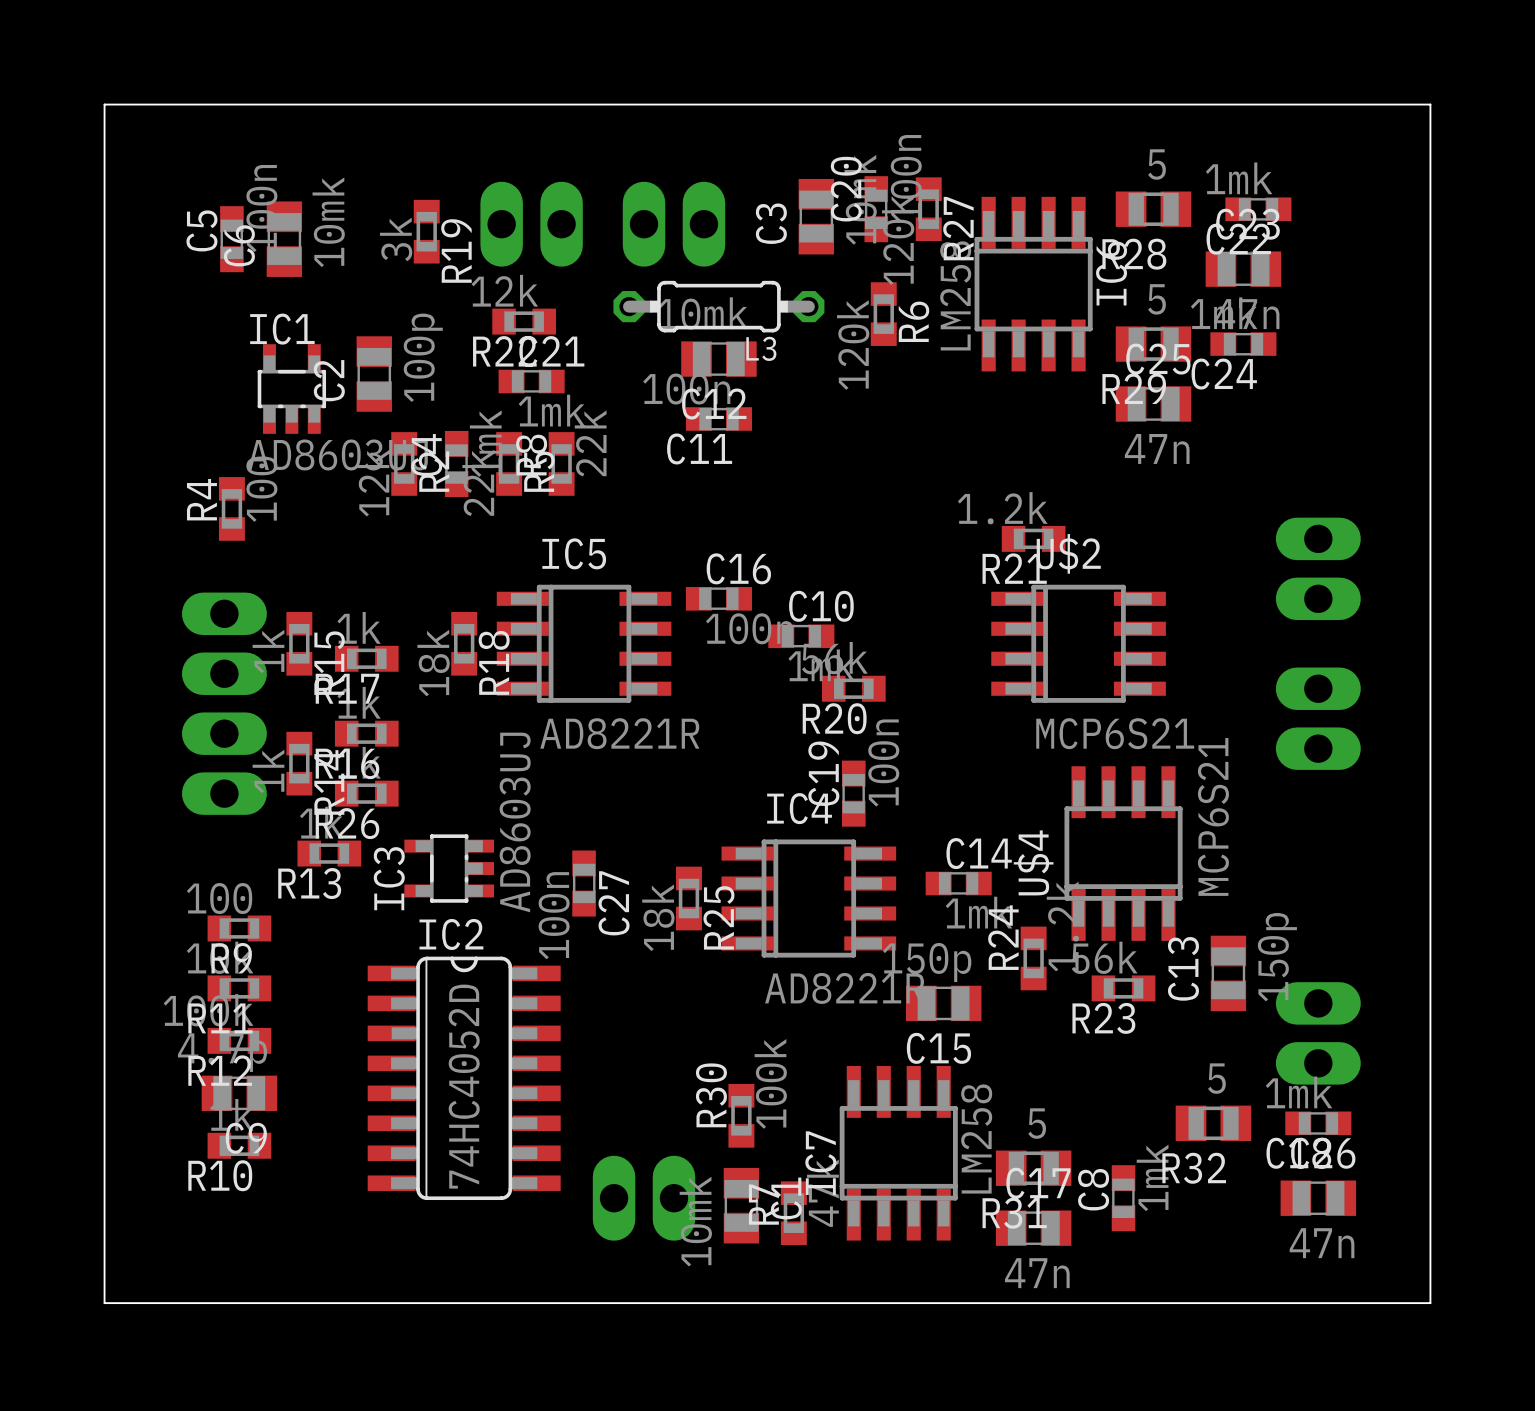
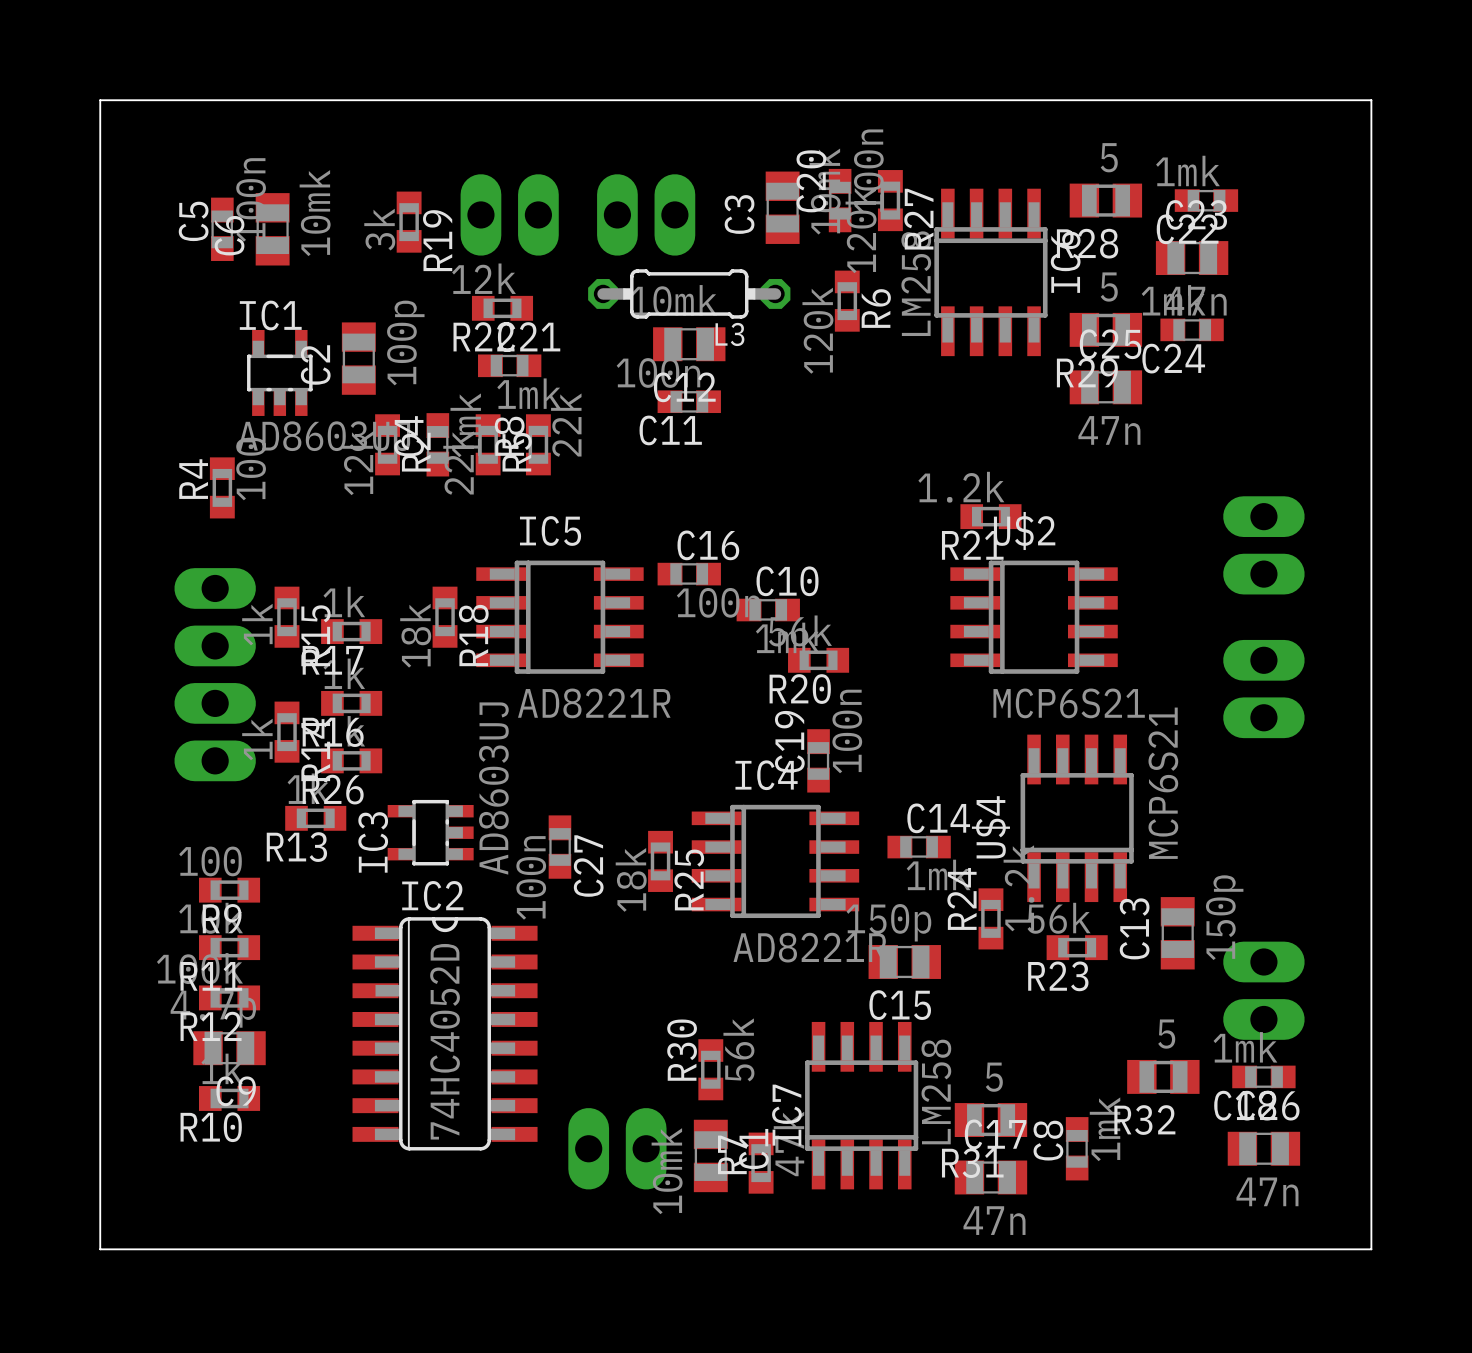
R30 value: 100k (770, 1083) -> 56k (738, 1049)

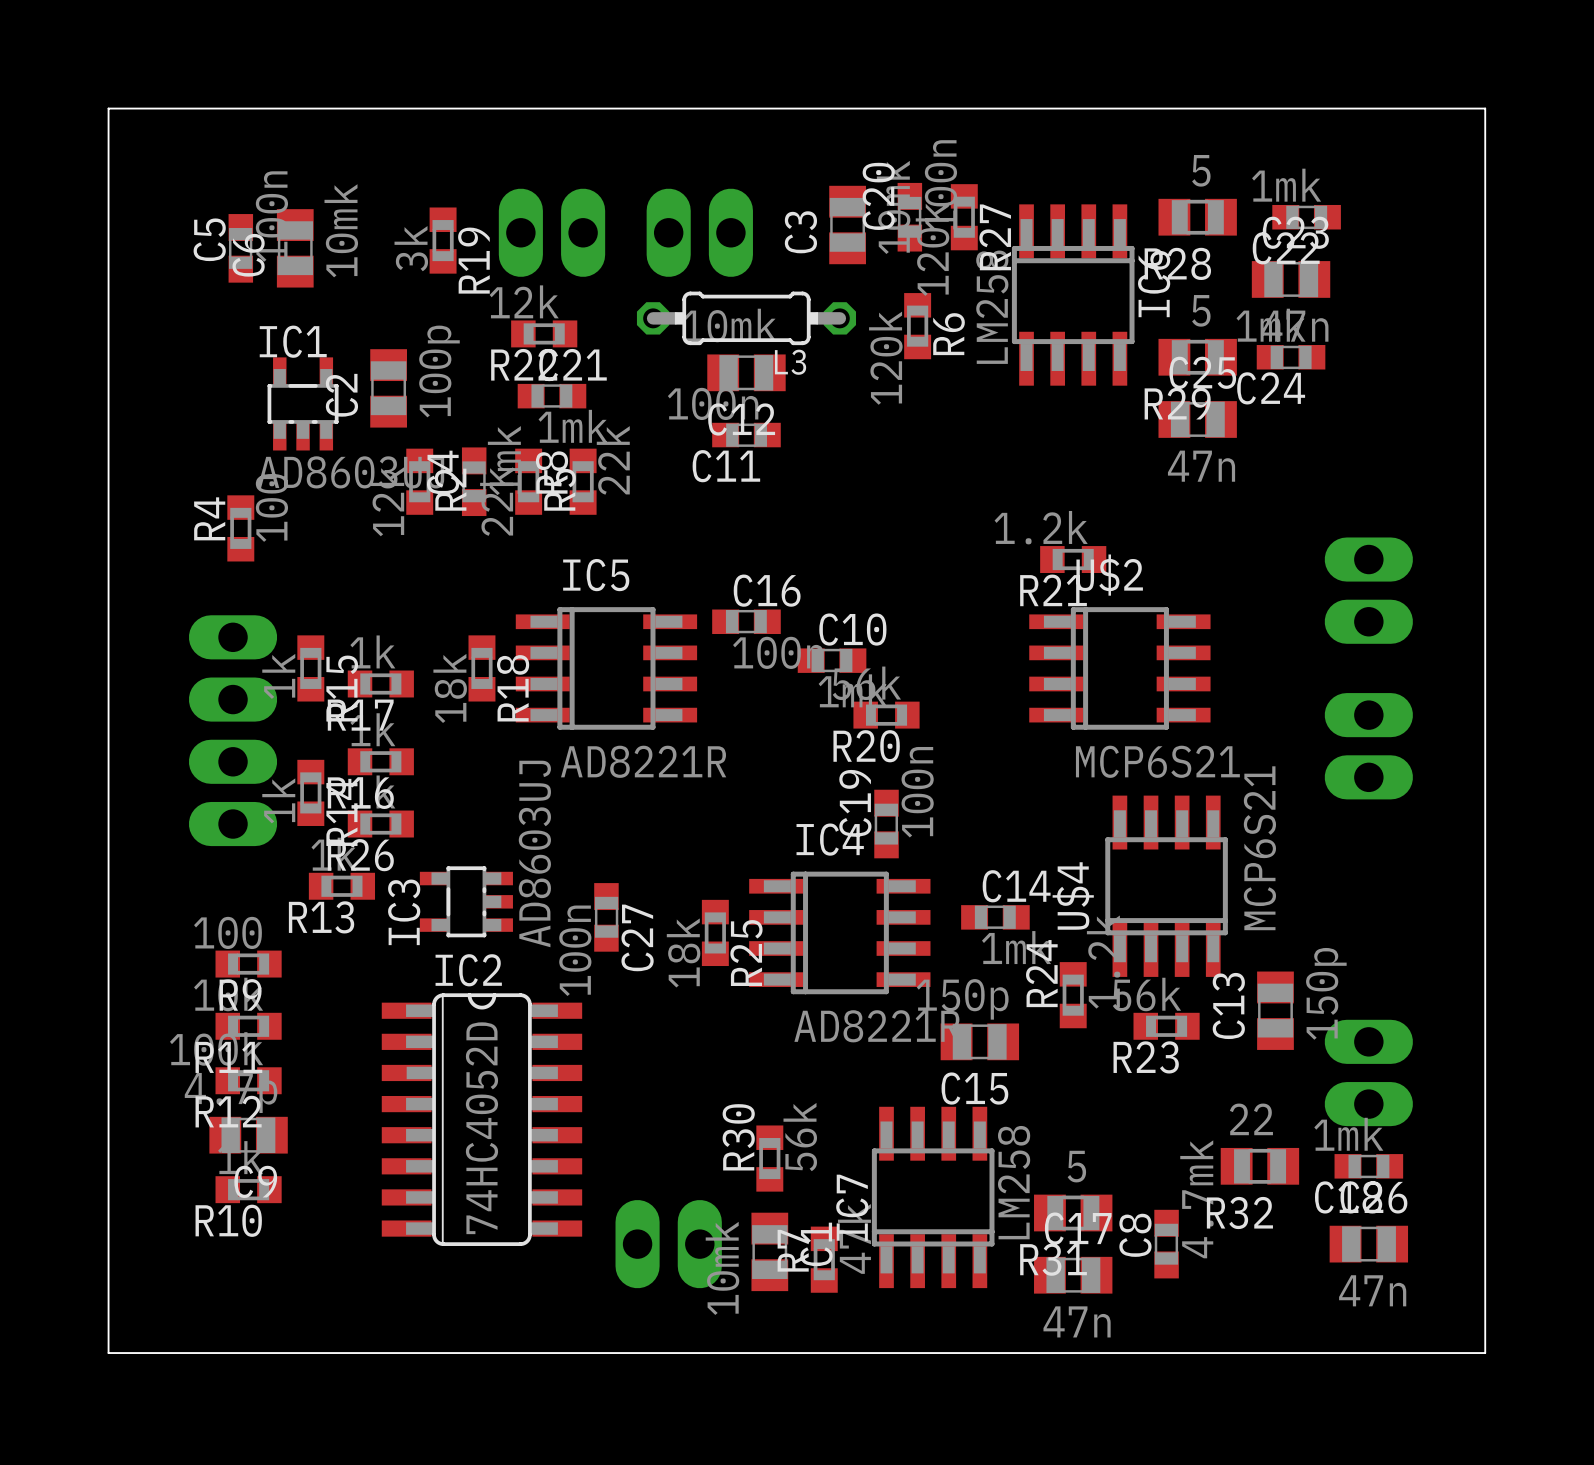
R32 value: 5 (1166, 1034) -> 22 (1251, 1119)
C8 value: 1mk (1105, 1129) -> 4.7mk (1196, 1199)

